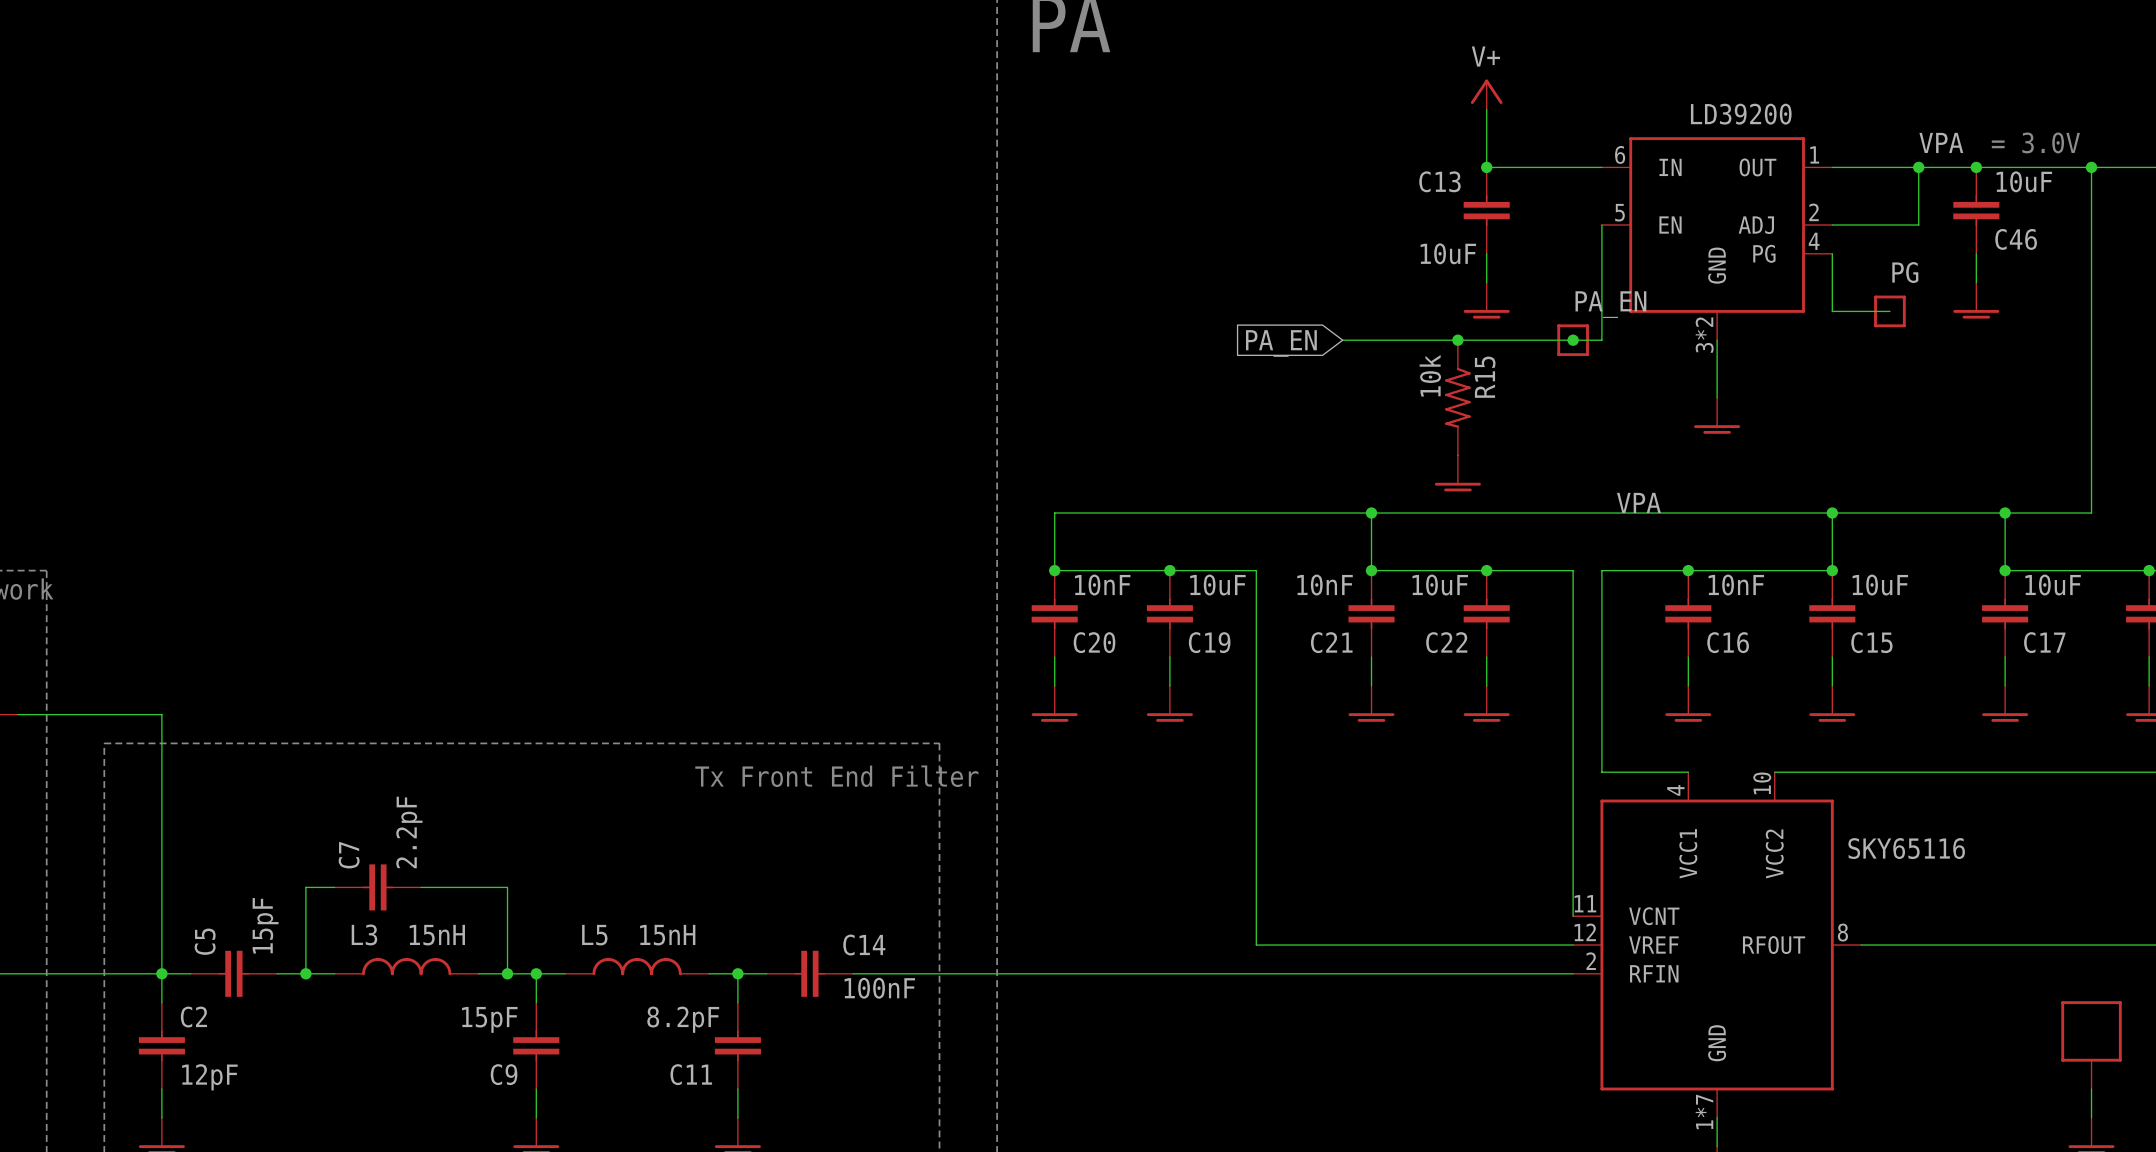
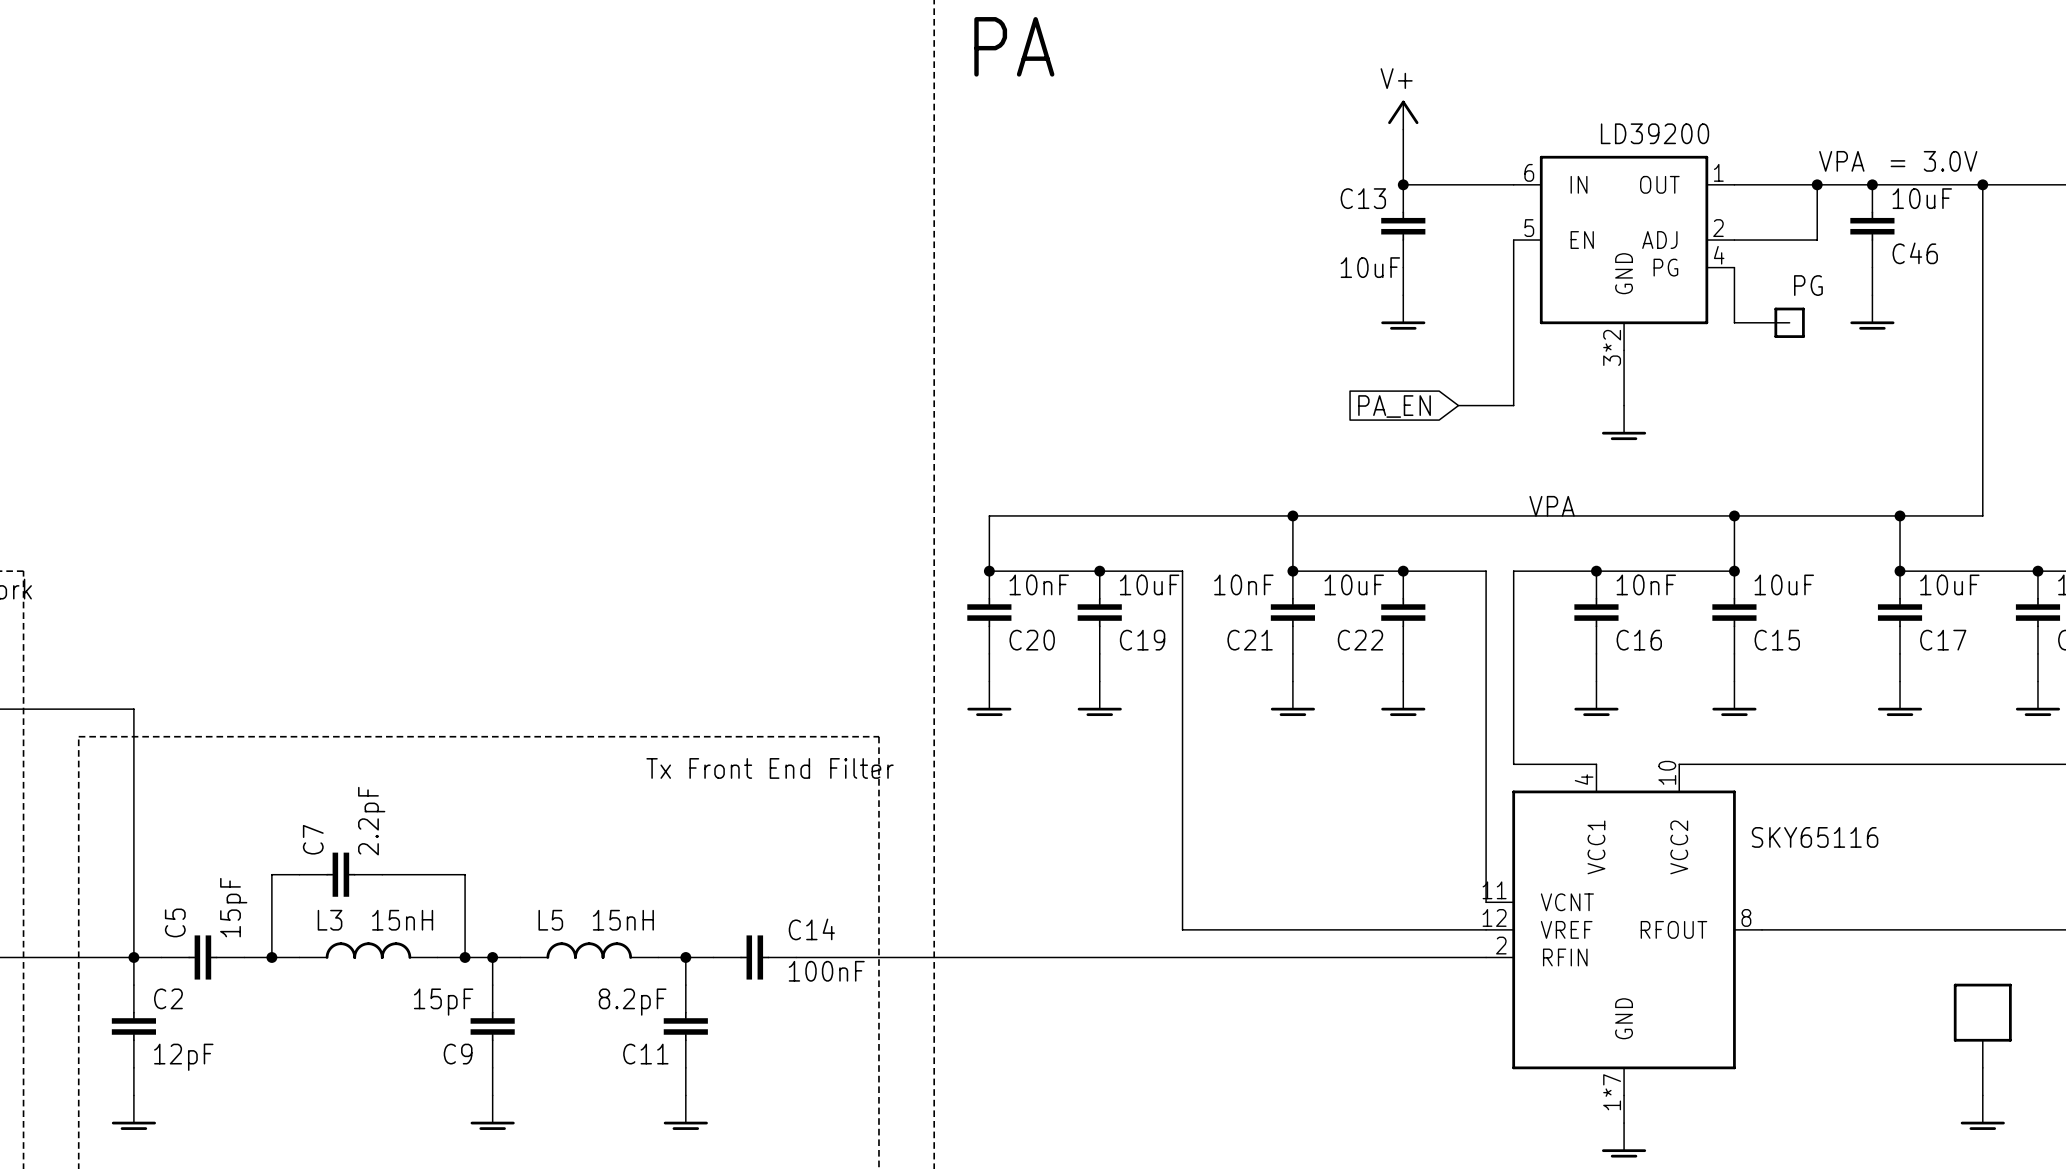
wire: (1342, 340) (1601, 340) -> (1458, 405) (1513, 405) (1513, 350)
junction: (1457, 340) -> none
PA_EN: (1573, 340) -> none
junction: (1573, 340) -> none
global label position: PA_EN (1281, 343) -> PA_EN (1394, 406)
R15: 10k (1457, 397) -> none
power symbol: (1457, 473) -> none

